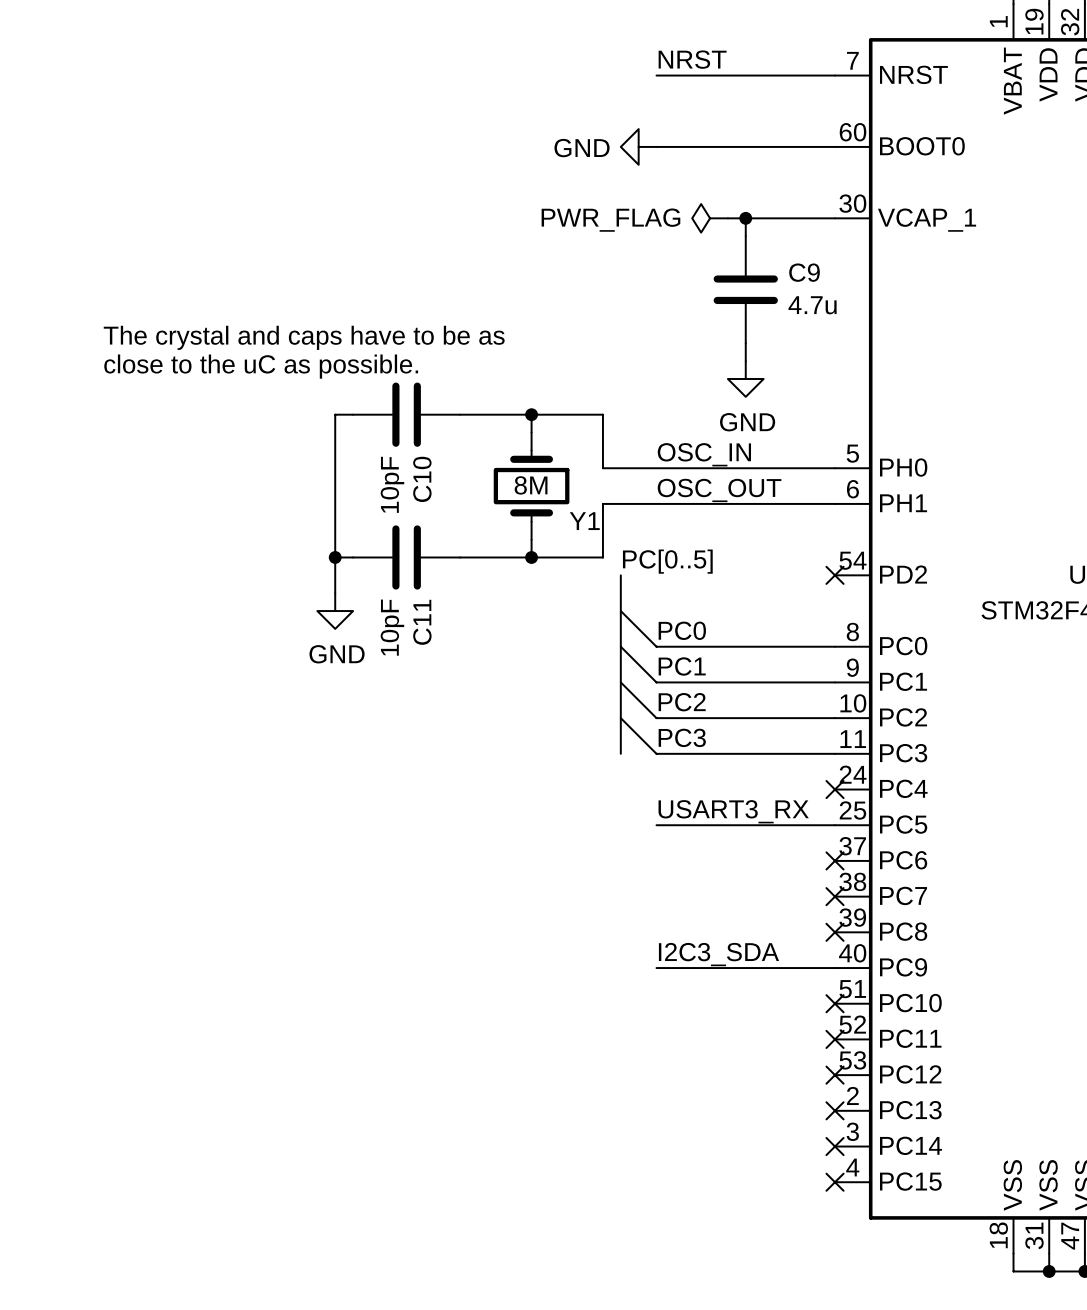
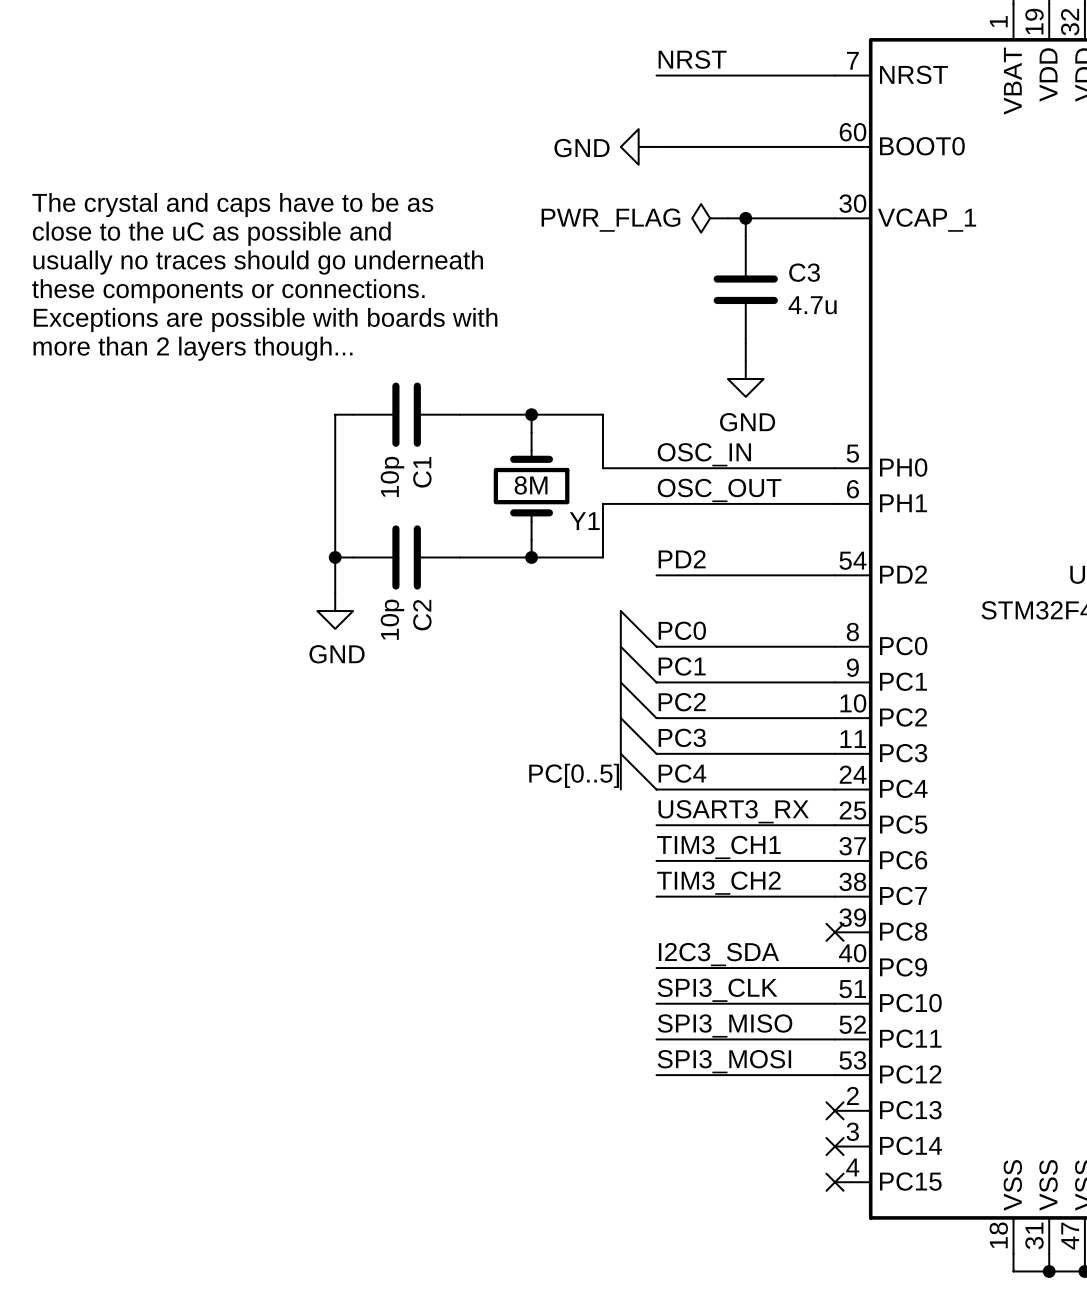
text: none -> close to the uC as possible and (211, 233)
text: none -> usually no traces should go underneath (258, 262)
C9 name: C9 (804, 272) -> C3 (804, 272)
text: none -> these components or connections. (228, 291)
text: none -> Exceptions are possible with boards with (265, 319)
text position: The crystal and caps have to be as (304, 337) -> The crystal and caps have to be as (232, 205)
text: none -> more than 2 layers though... (192, 348)
text: close to the uC as possible. (261, 366) -> none
C10 name: C10 (422, 479) -> C1 (422, 472)
C10 value: 10pF (392, 484) -> 10p (392, 476)
label: none -> PD2 (682, 559)
label position: PC[0..5] (667, 561) -> PC[0..5] (574, 775)
bus: (620, 575) (620, 611) -> (620, 753) (620, 789)
wire: none -> (656, 575) (835, 575)
no-connect mark: (835, 575) -> none
C11 name: C11 (422, 622) -> C2 (422, 615)
C11 value: 10pF (392, 627) -> 10p (392, 619)
wire: none -> (620, 753) (656, 789) (835, 789)
label: none -> PC4 (682, 773)
no-connect mark: (835, 789) -> none
label: none -> TIM3_CH1 (718, 847)
wire: none -> (656, 860) (835, 860)
no-connect mark: (835, 860) -> none
label: none -> TIM3_CH2 (718, 883)
wire: none -> (656, 896) (835, 896)
no-connect mark: (835, 896) -> none
label: none -> SPI3_CLK (717, 990)
wire: none -> (656, 1003) (835, 1003)
no-connect mark: (835, 1003) -> none
label: none -> SPI3_MISO (724, 1025)
wire: none -> (656, 1039) (835, 1039)
no-connect mark: (835, 1039) -> none
label: none -> SPI3_MOSI (724, 1061)
wire: none -> (656, 1075) (835, 1075)
no-connect mark: (835, 1075) -> none

